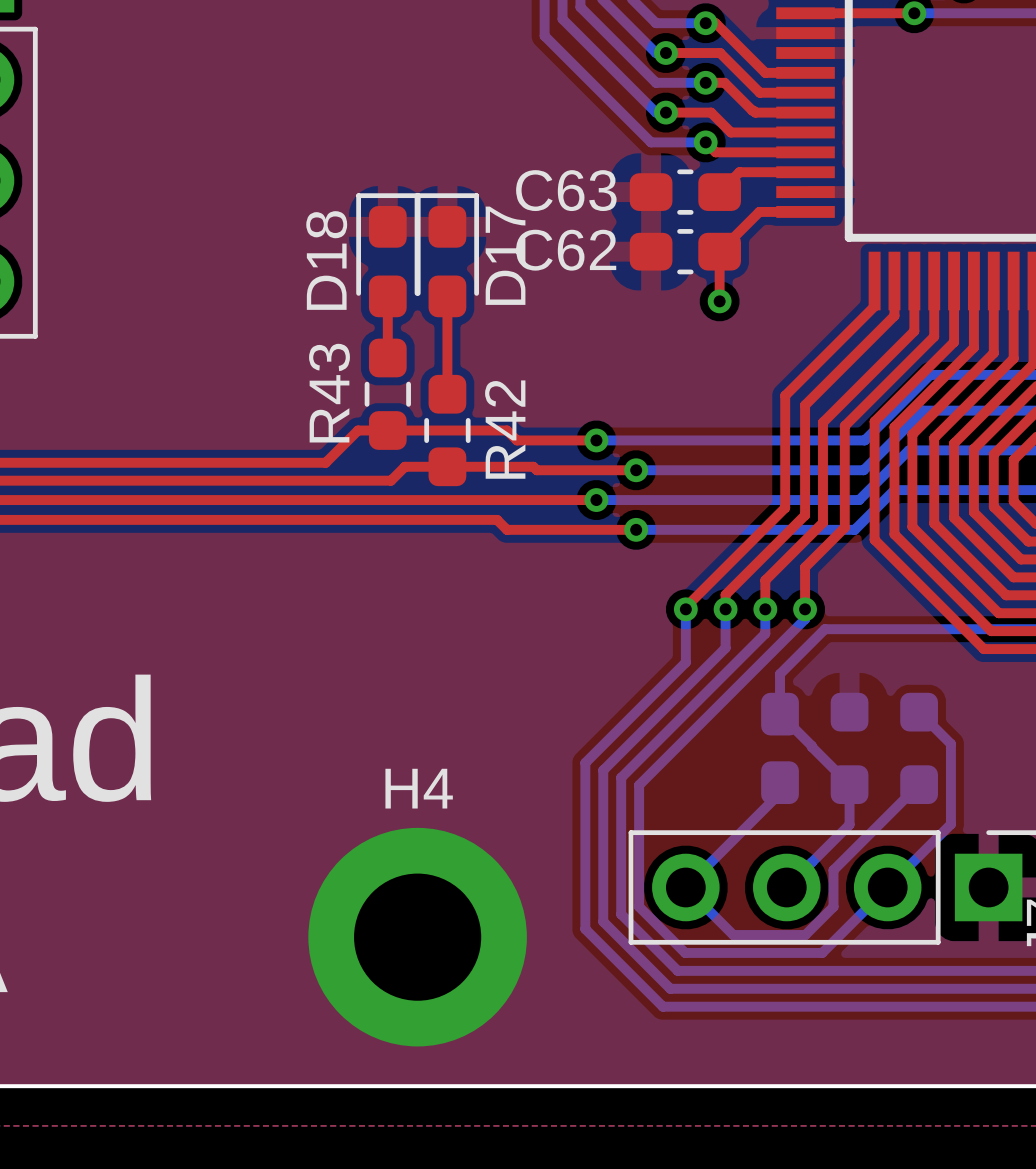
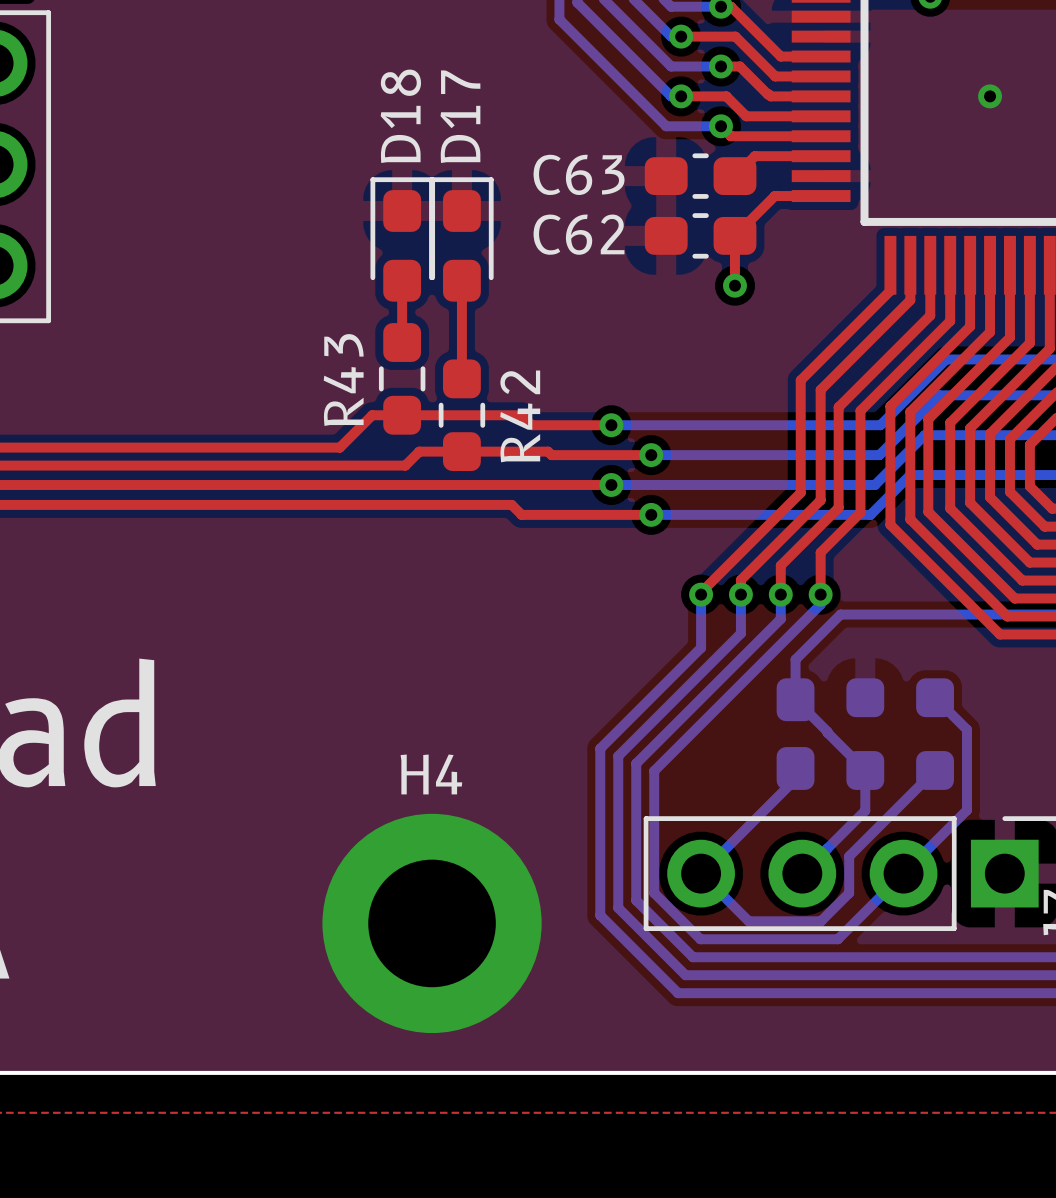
via: none -> (990, 96)
D17 name position: D17 (505, 255) -> D17 (460, 116)
D18 name position: D18 (326, 260) -> D18 (400, 116)

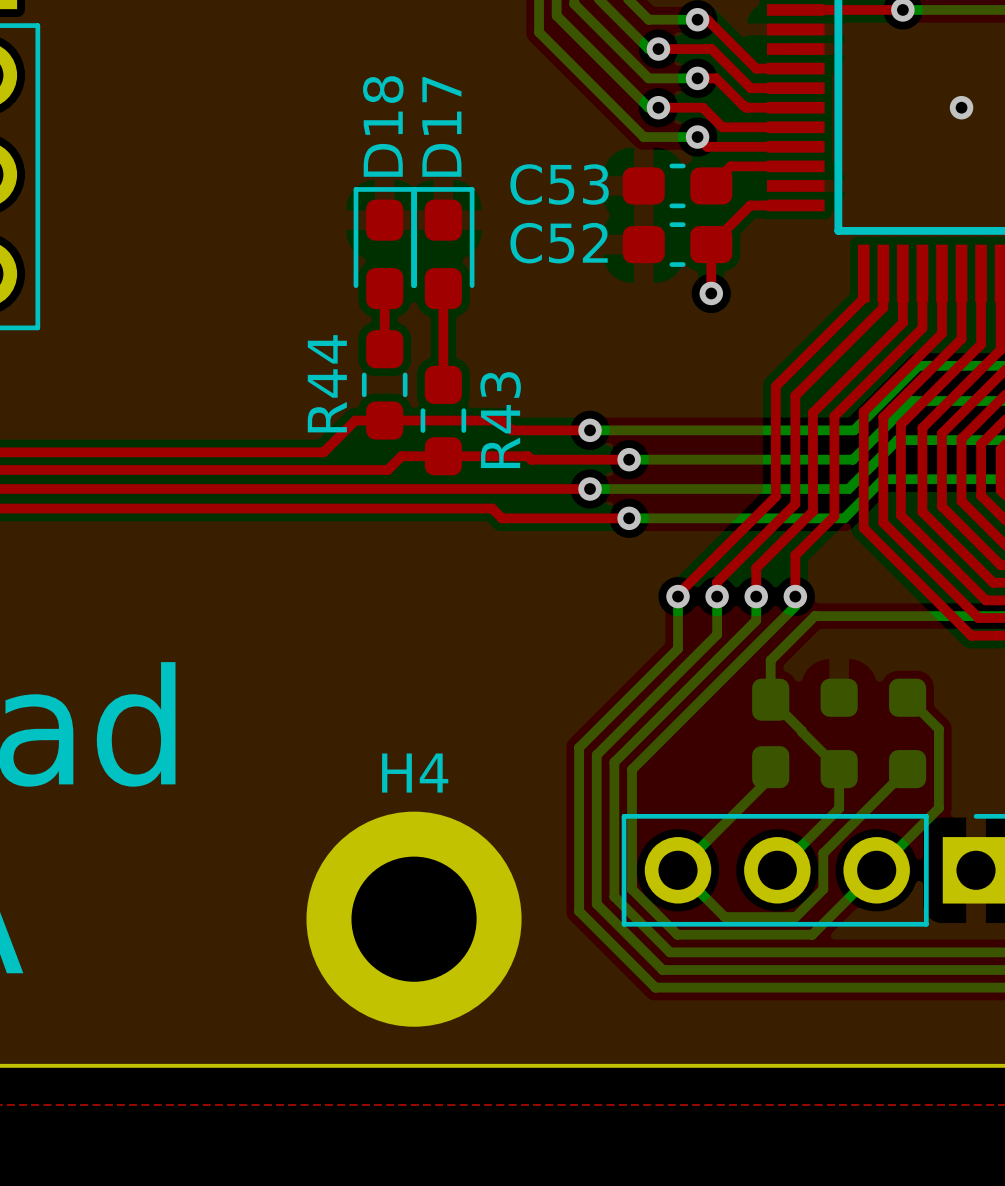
C63 name: C63 (579, 174) -> C53 (559, 184)
C62 name: C62 (579, 234) -> C52 (559, 243)
R43 name: R43 (343, 380) -> R44 (327, 383)
R42 name: R42 (520, 416) -> R43 (500, 420)

